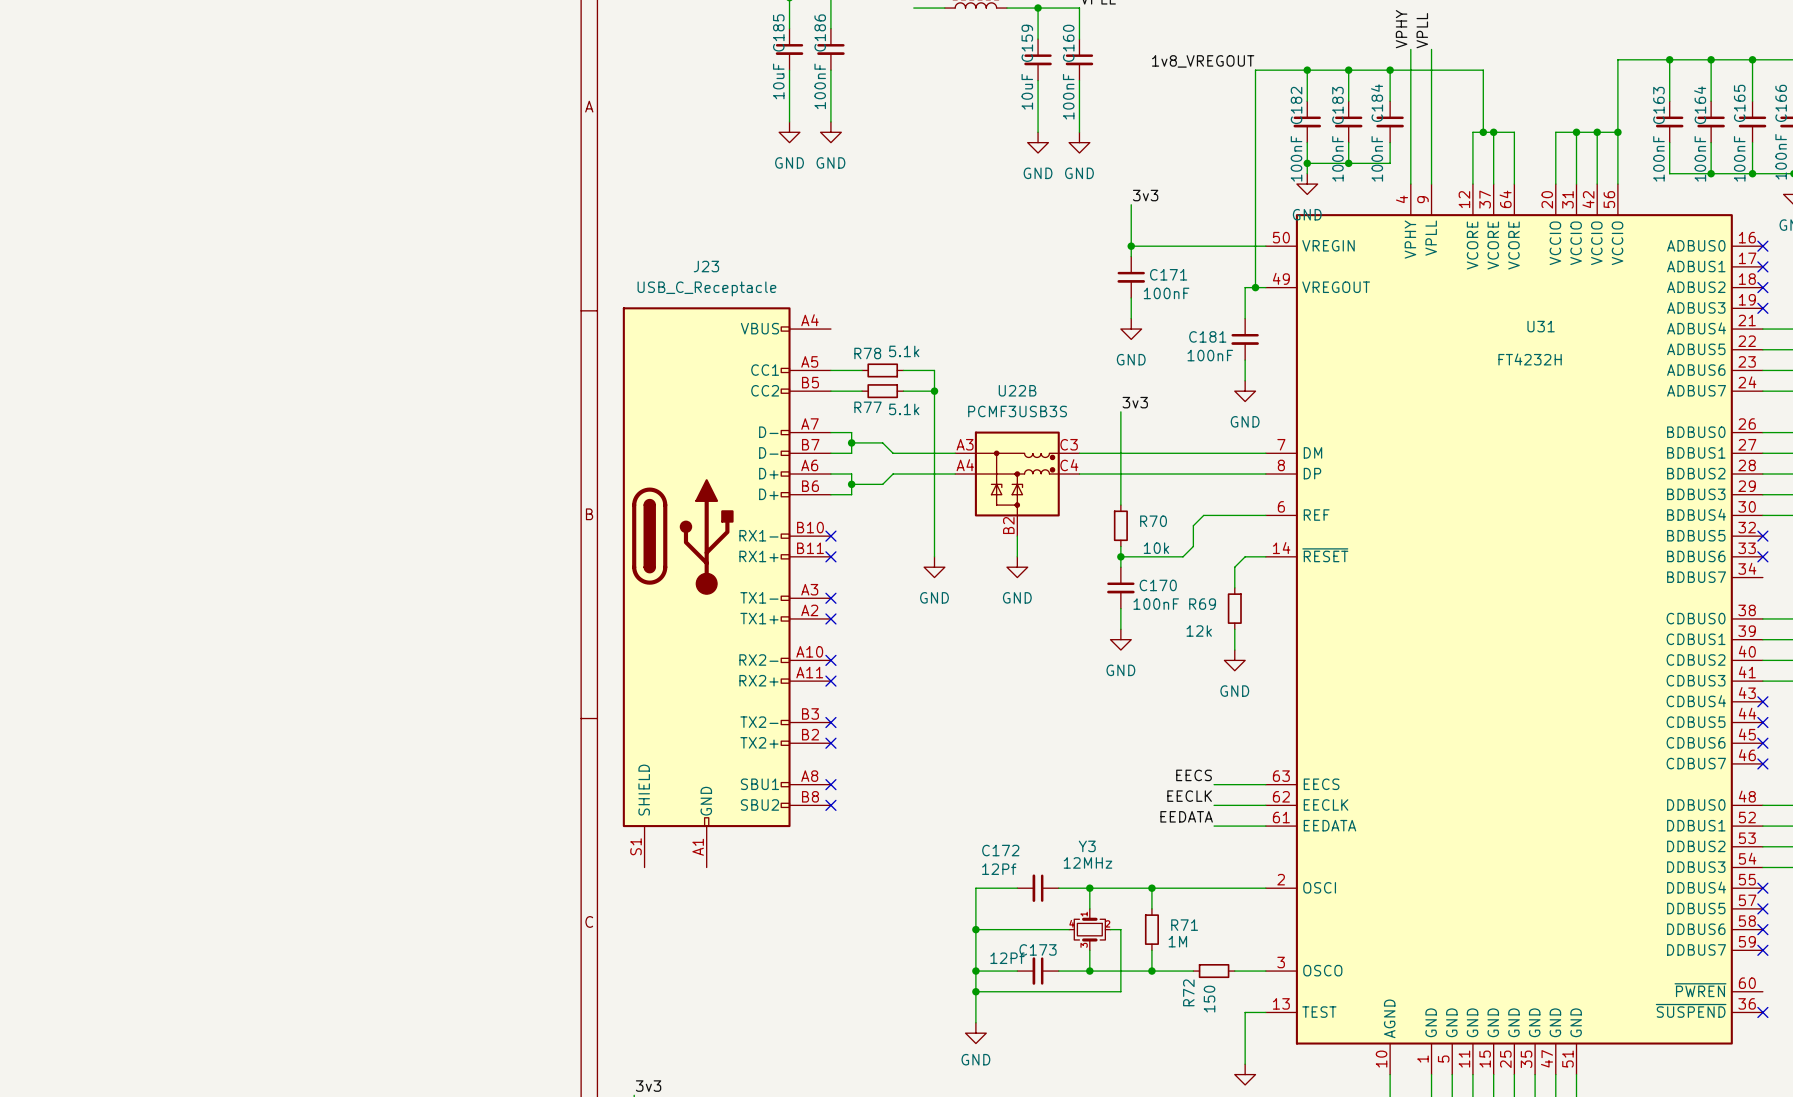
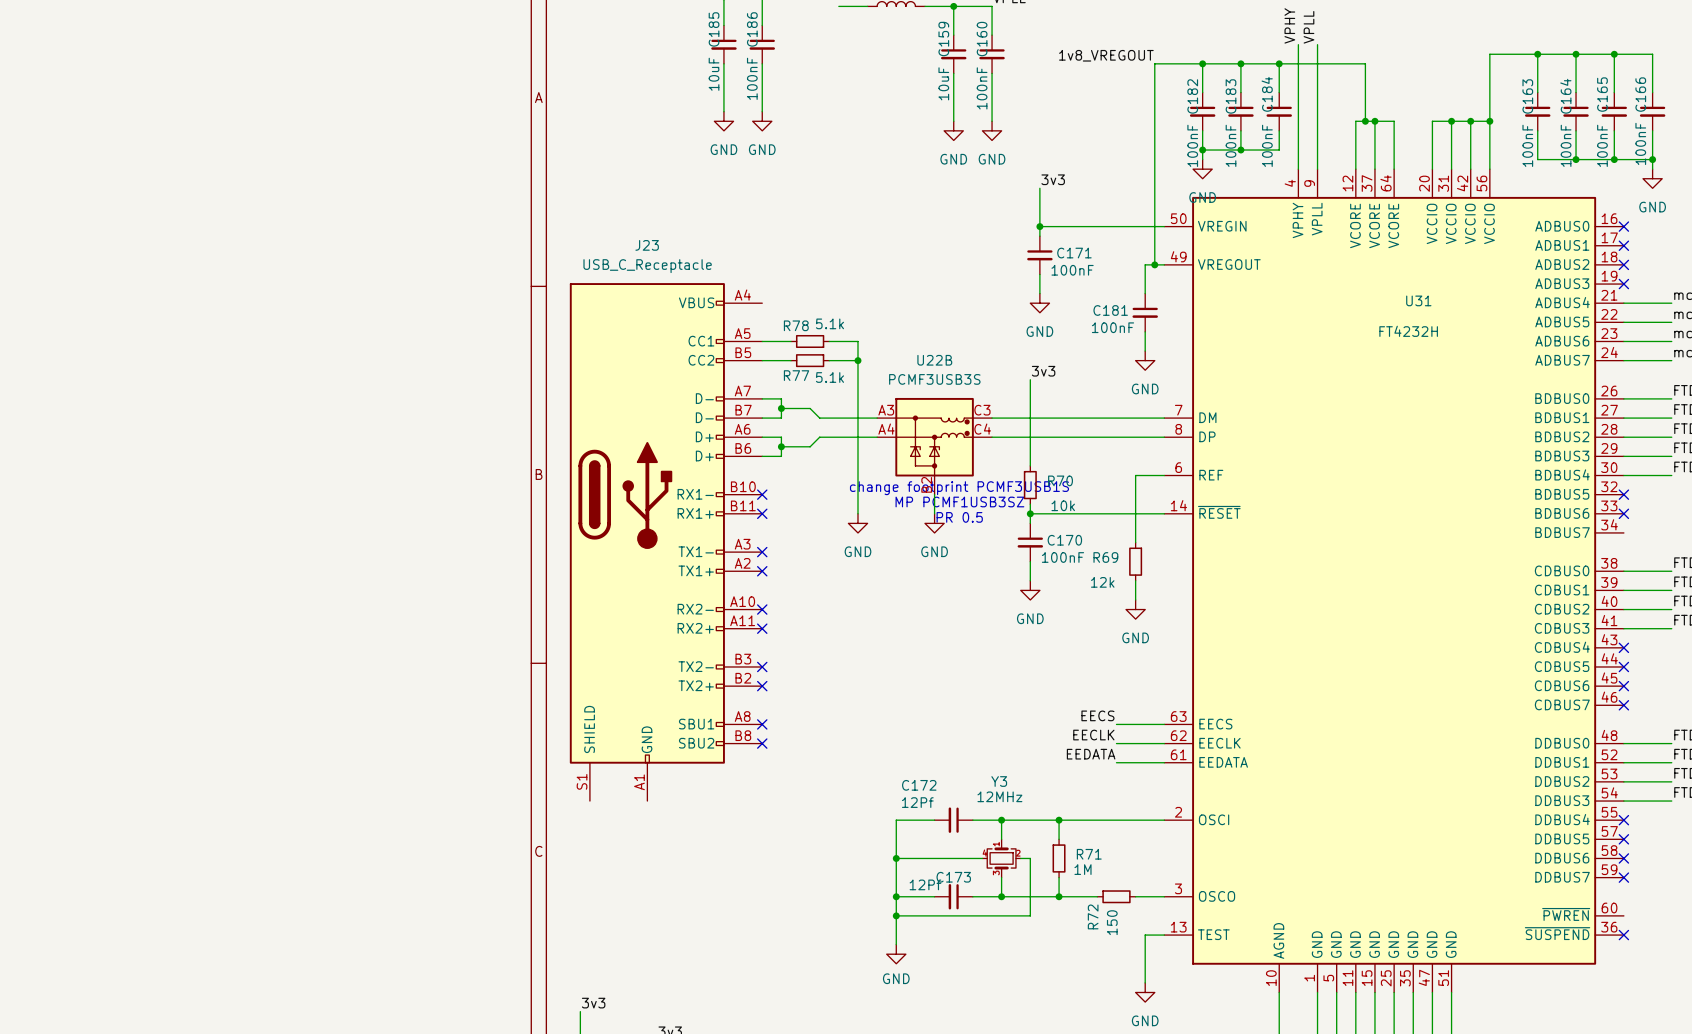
wire: (1234, 515) (1203, 515) (1193, 525) (1193, 546) (1183, 556) -> (1145, 513) (1087, 513)
text: none -> change footprint PCMF3USB1S (959, 488)
text: none -> MP PCMF1USB3SZ (959, 501)
wire: (1245, 556) (1234, 567) -> (1135, 475) (1135, 523)
text: none -> PR 0.5 (959, 517)

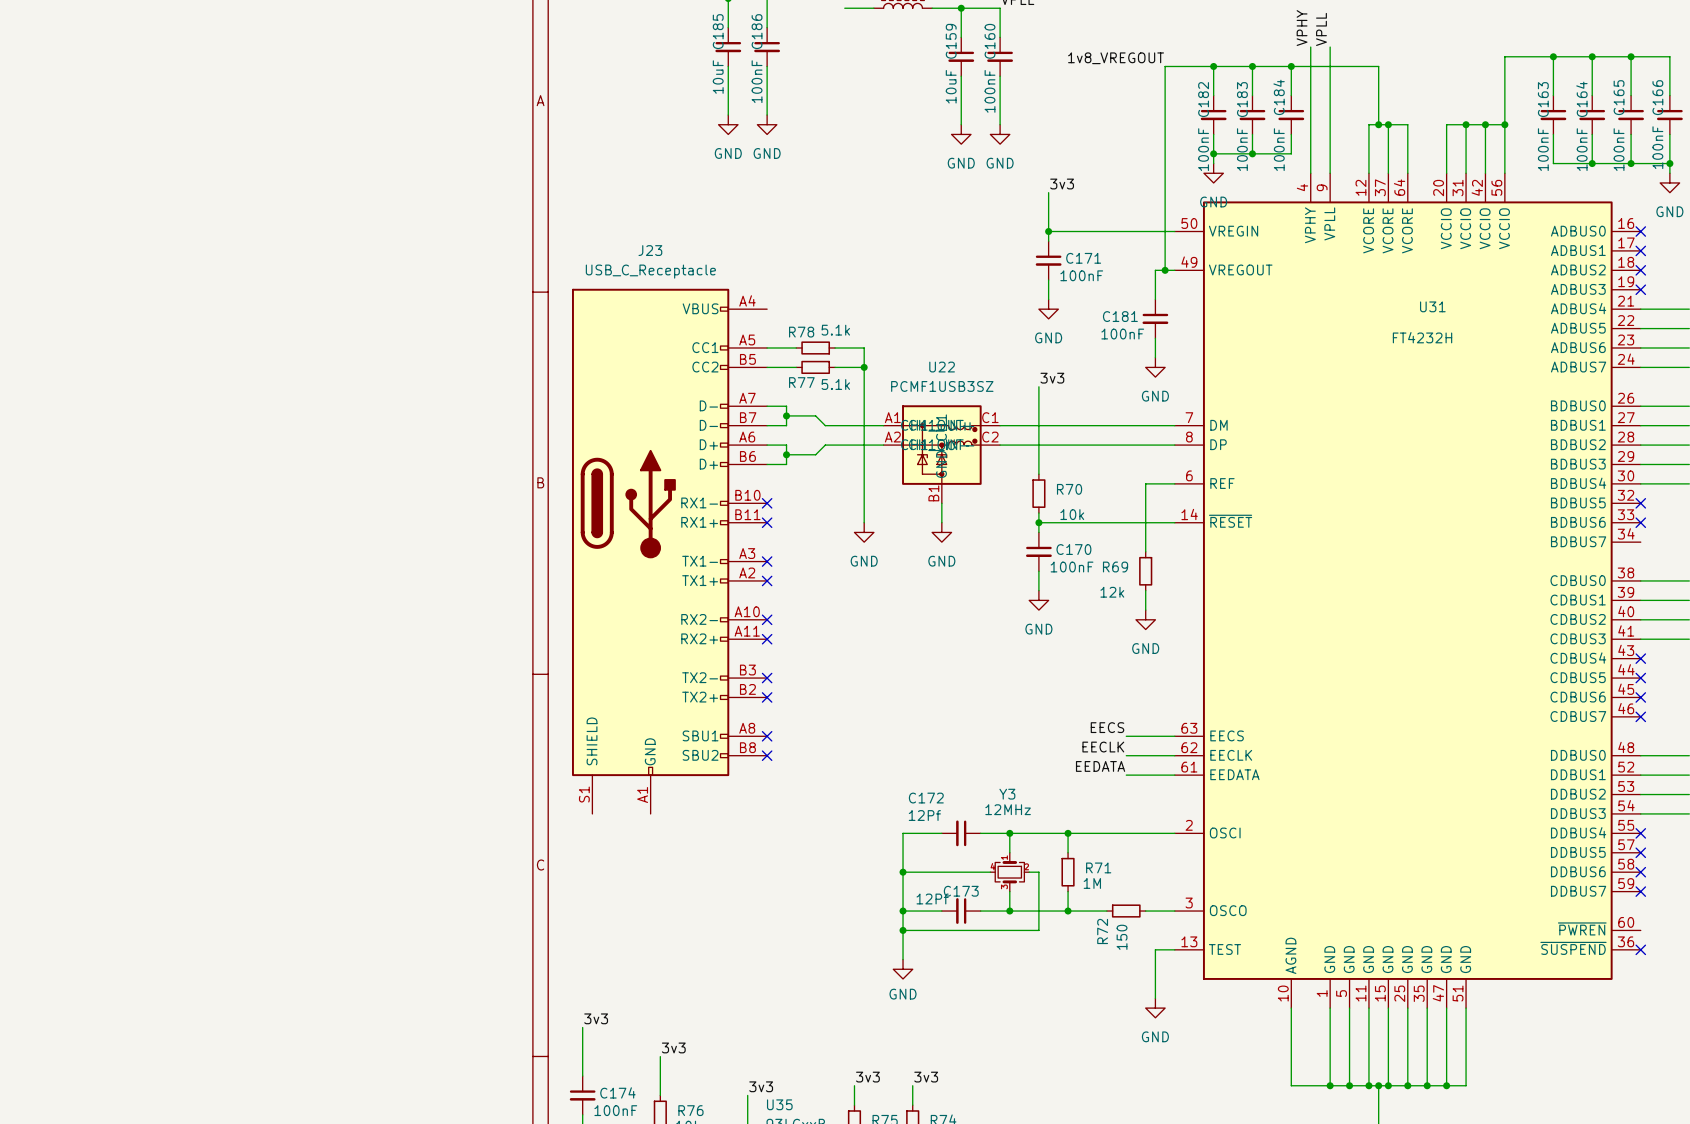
U22B name: U22B (934, 360) -> U22 (942, 367)
U22B value: PCMF3USB3S (934, 379) -> PCMF1USB3SZ (942, 386)
U22B symbol: [877, 397, 993, 495] -> [883, 405, 1001, 504]
text: change footprint PCMF3USB1S (959, 488) -> none
text: MP PCMF1USB3SZ (959, 501) -> none
text: PR 0.5 (959, 517) -> none

